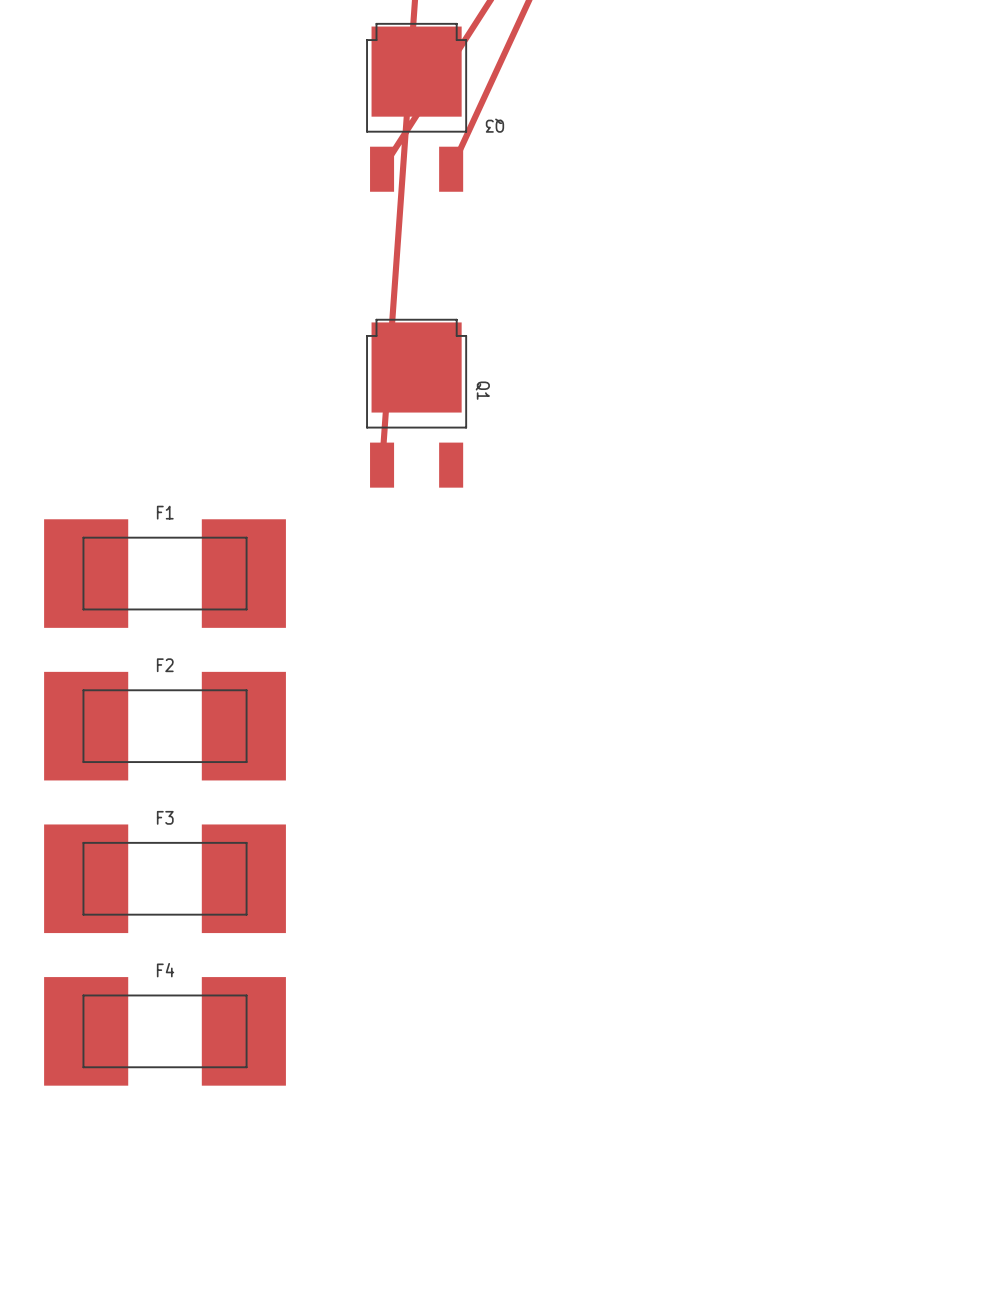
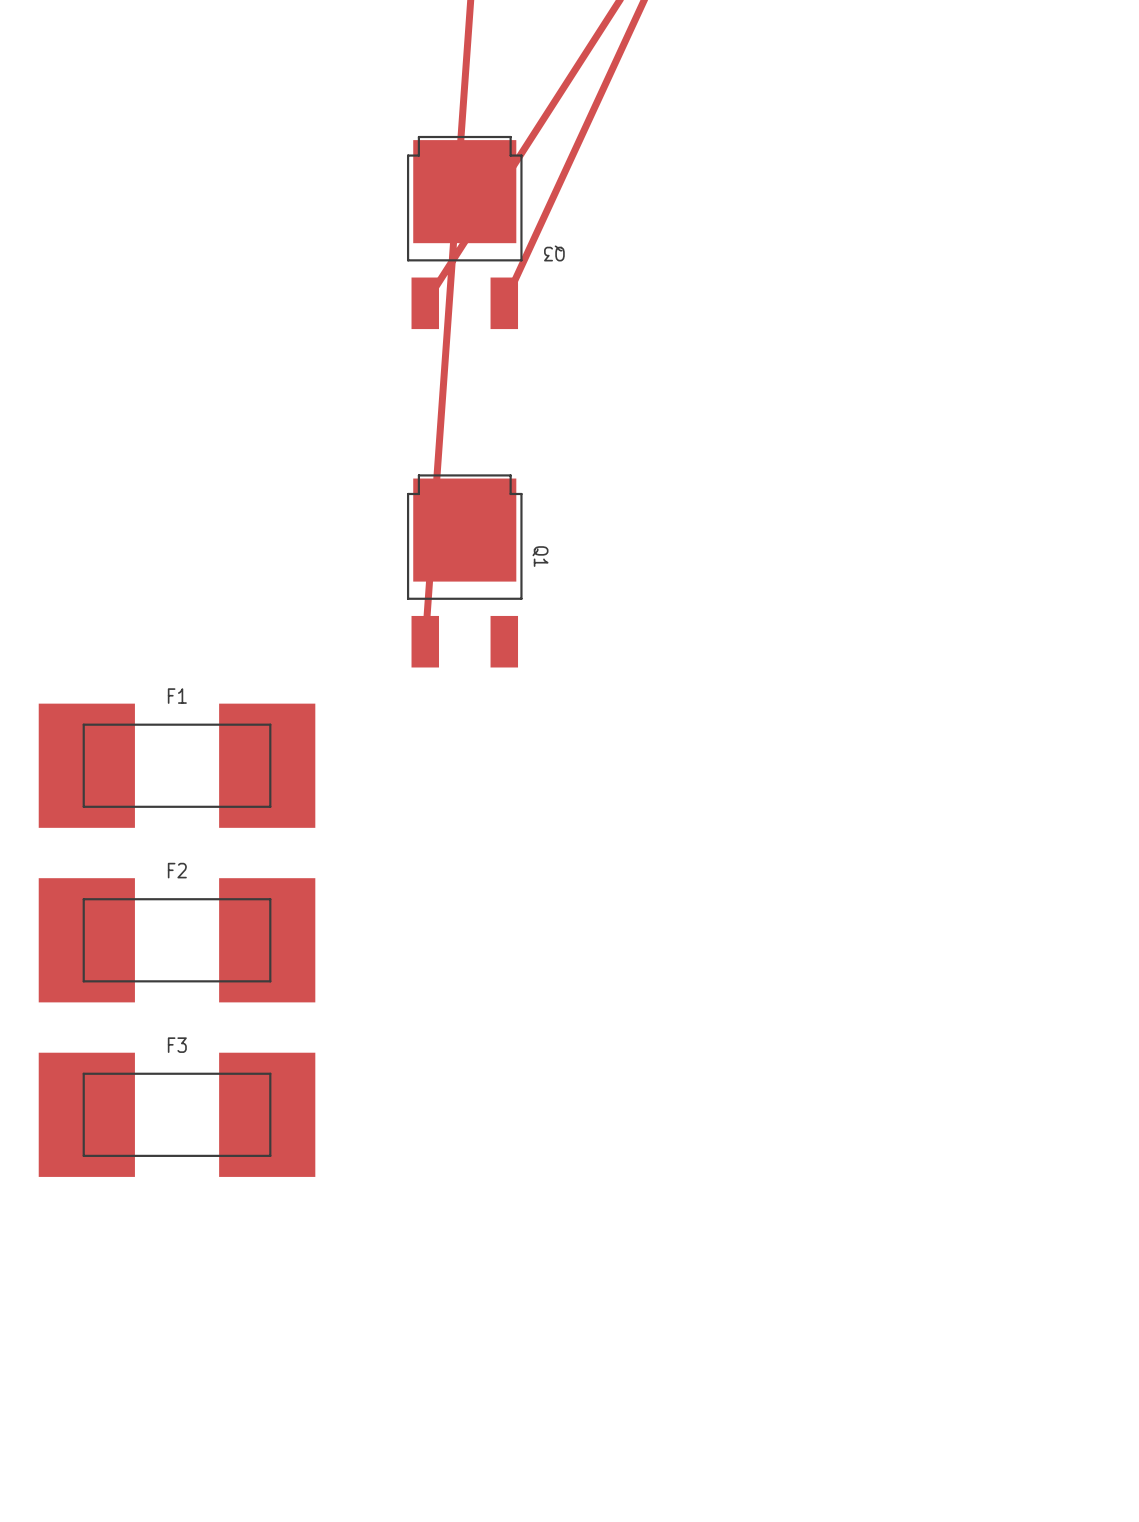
F4: (165, 1031) -> none

